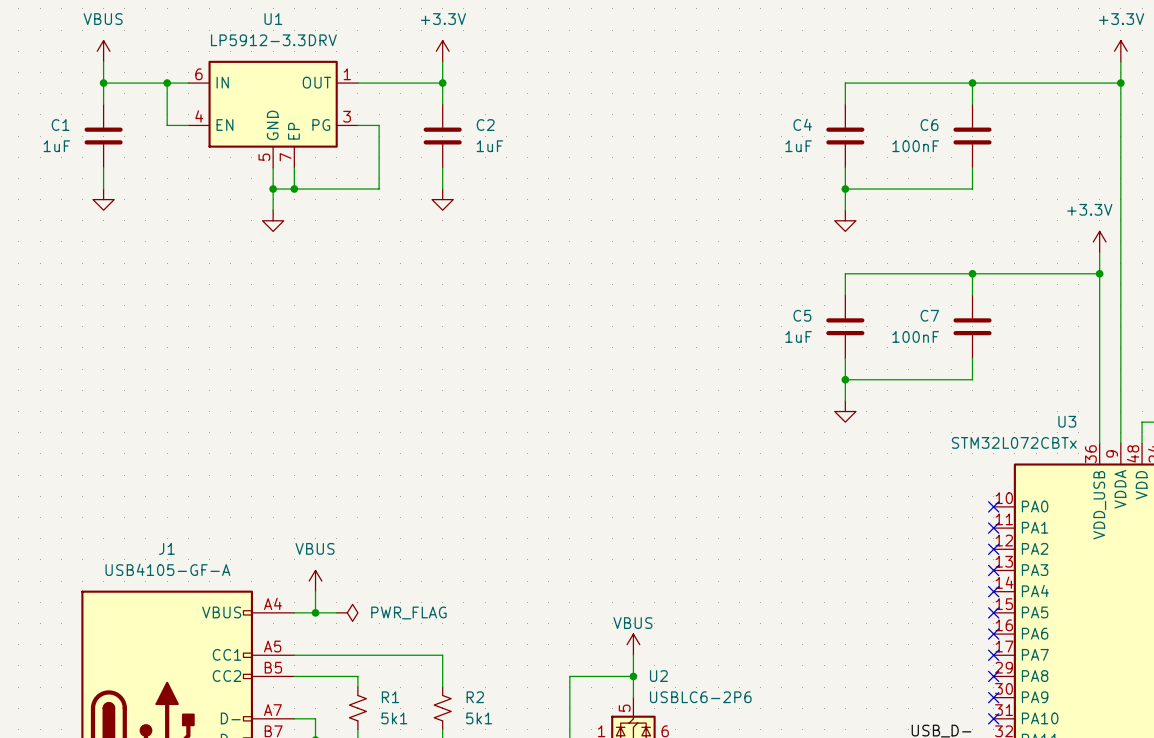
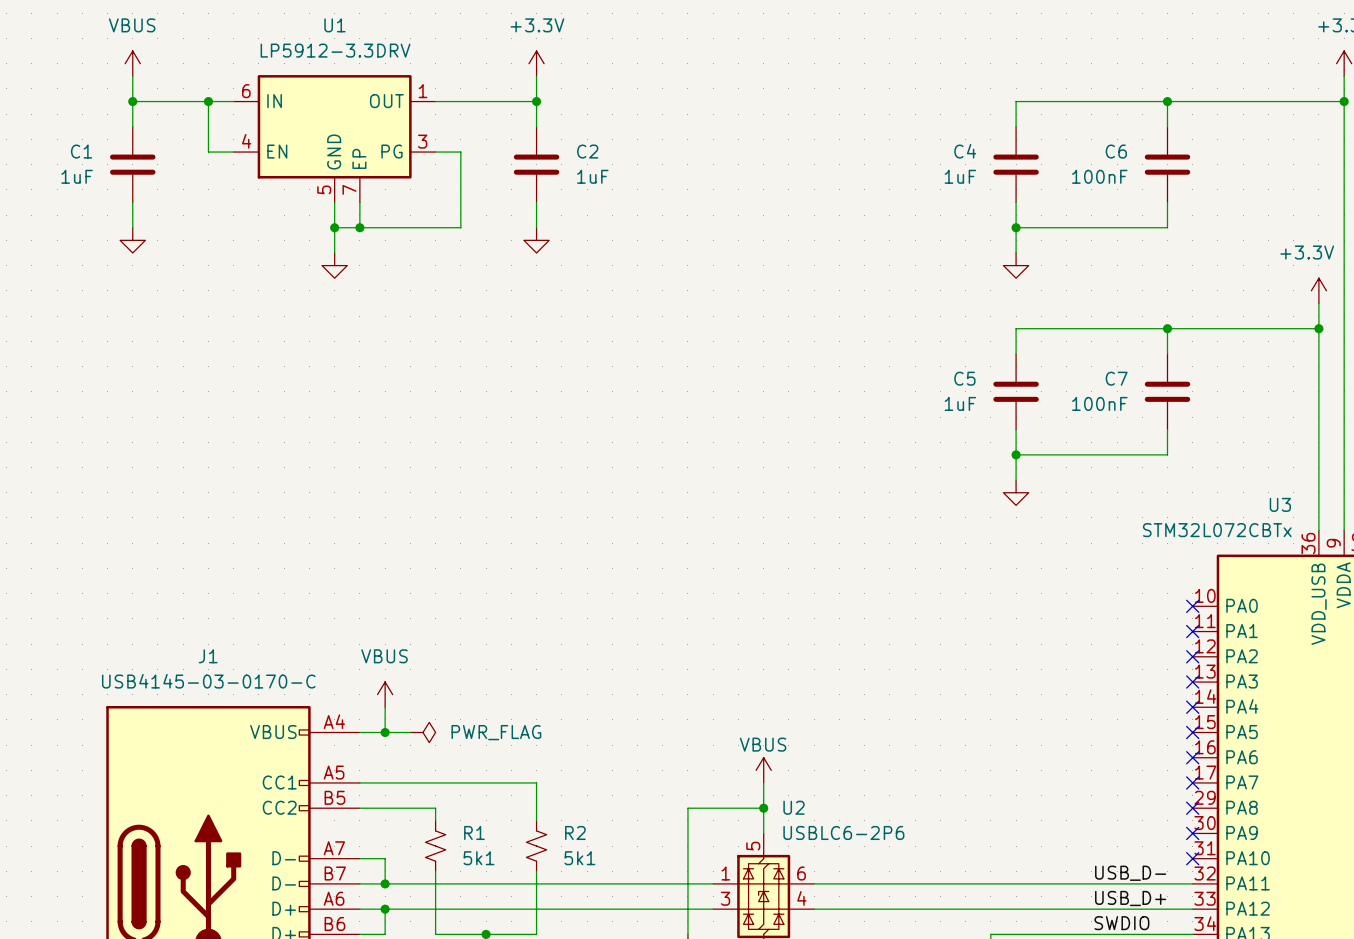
J1 value: USB4105-GF-A (167, 569) -> USB4145-03-0170-C (208, 681)

